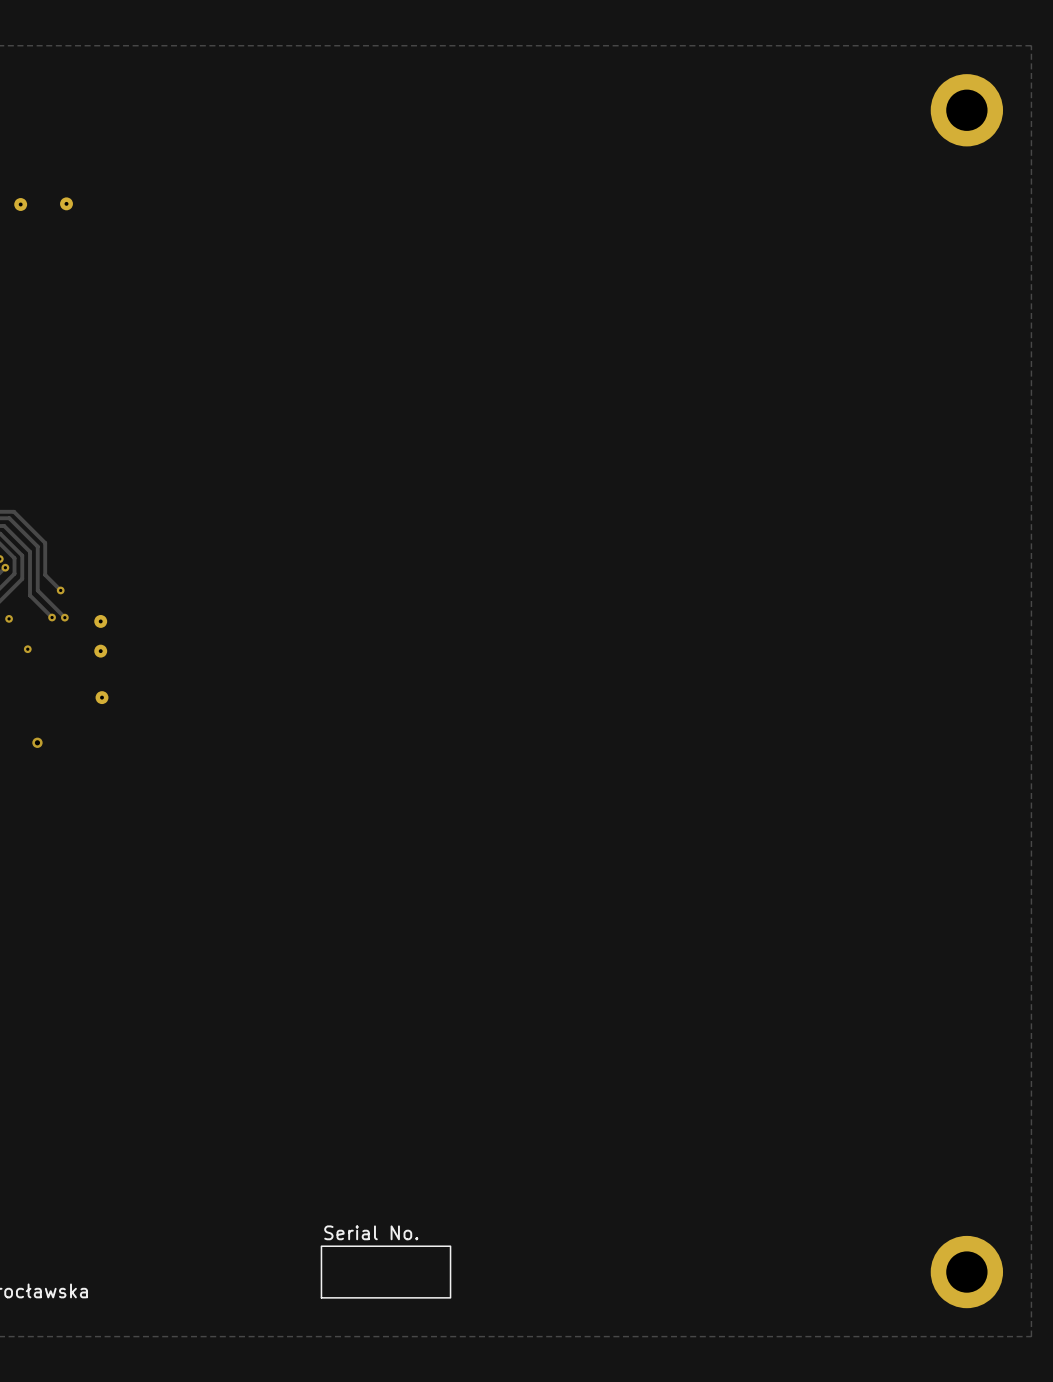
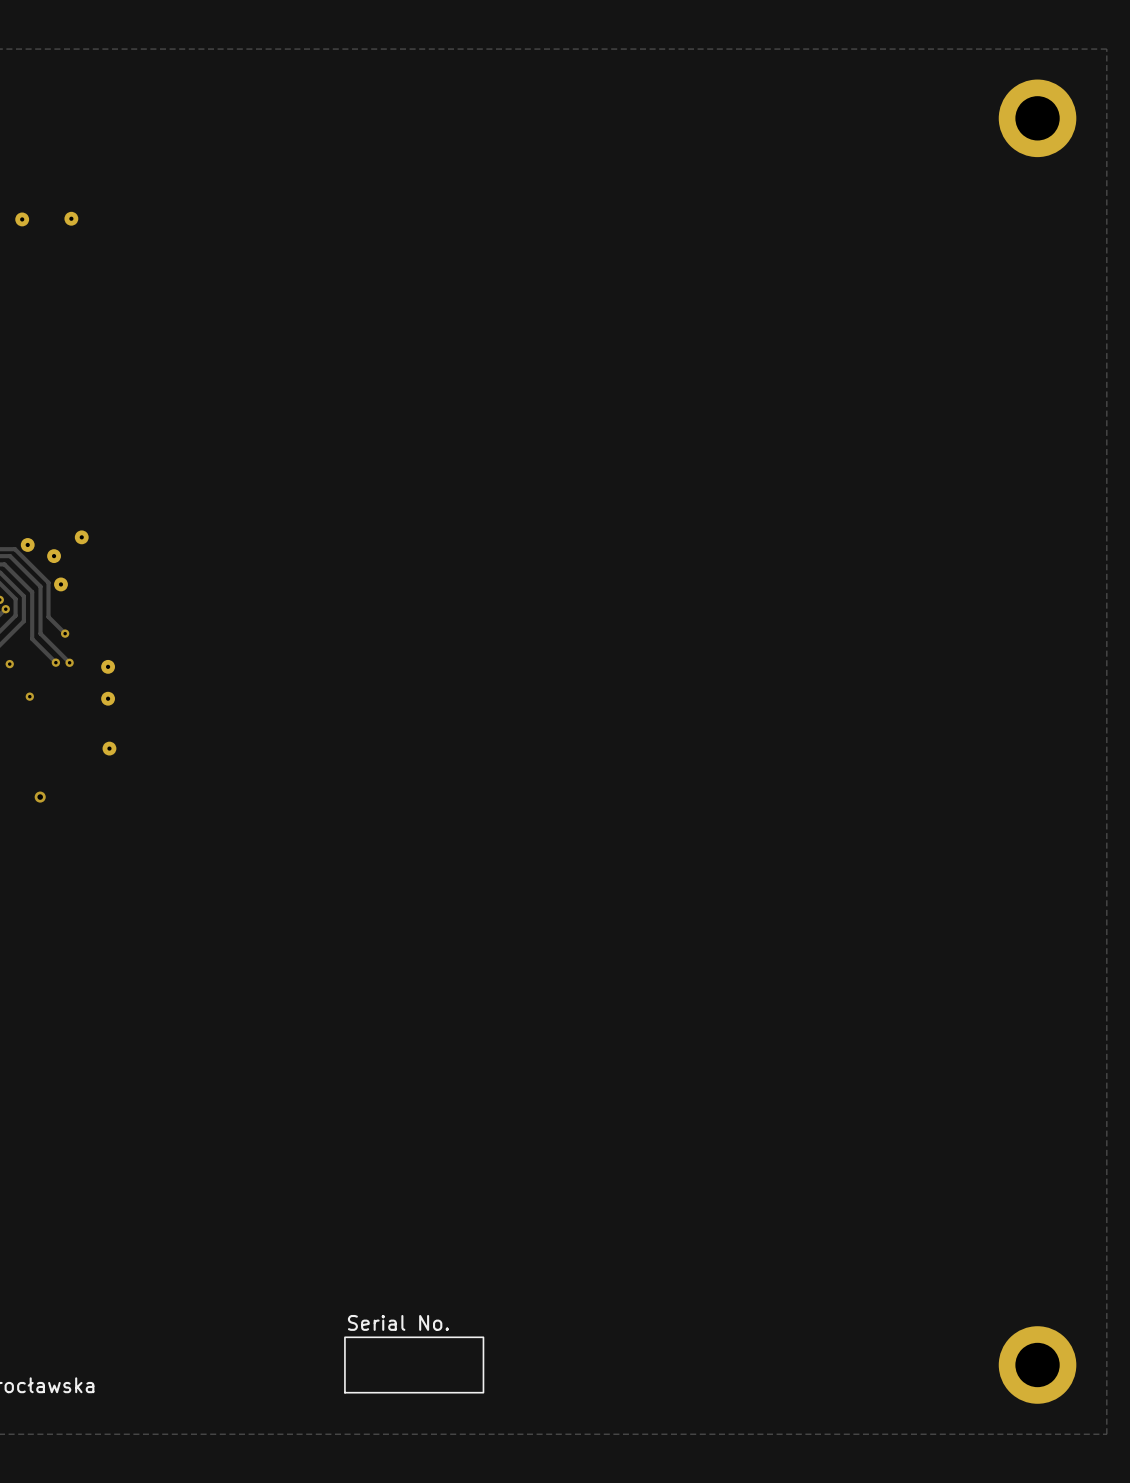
part: none -> (81, 537)
part: none -> (27, 544)
part: none -> (54, 556)
part: none -> (60, 584)

